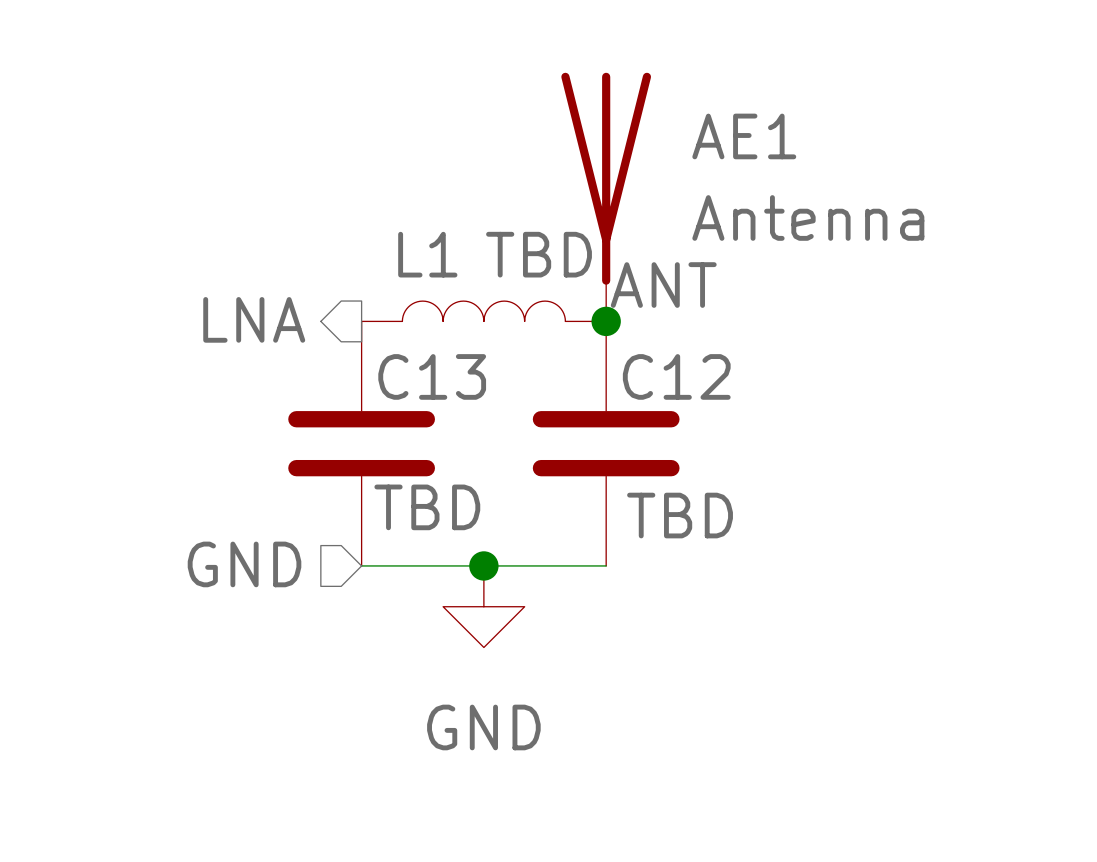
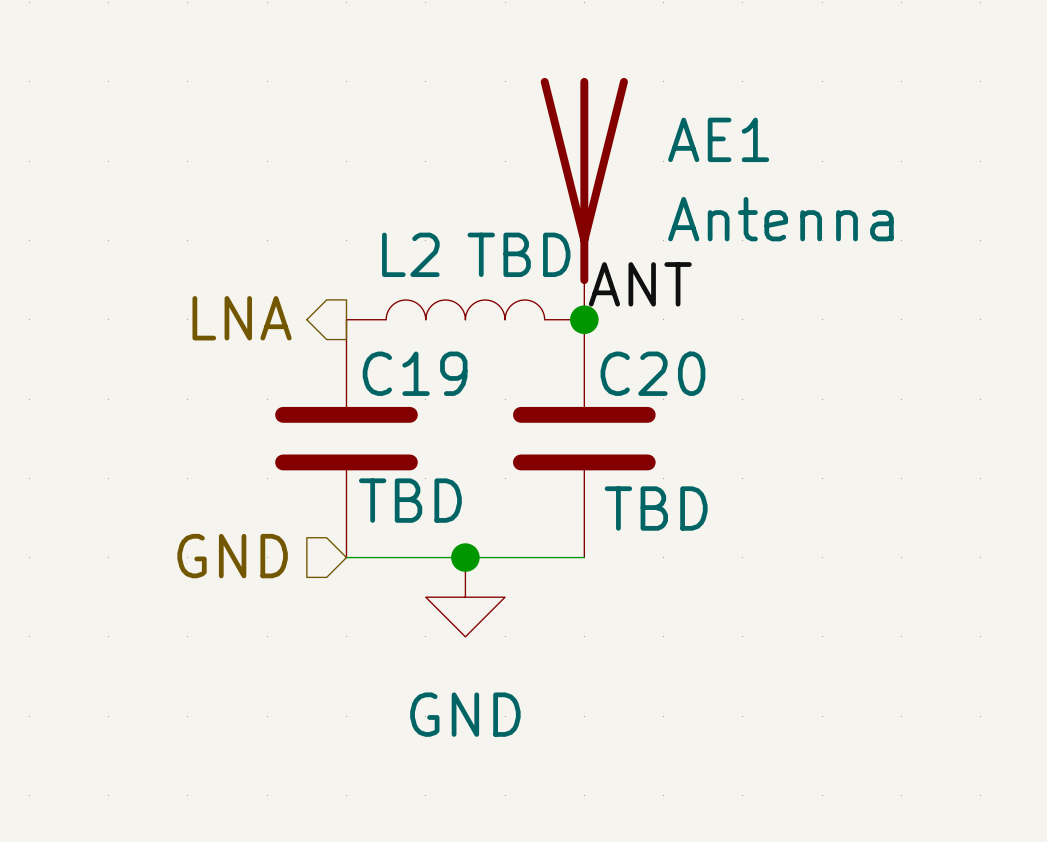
L1 name: L1 (427, 254) -> L2 (410, 254)
C13 name: C13 (432, 376) -> C19 (415, 373)
C12 name: C12 (676, 376) -> C20 (652, 373)

